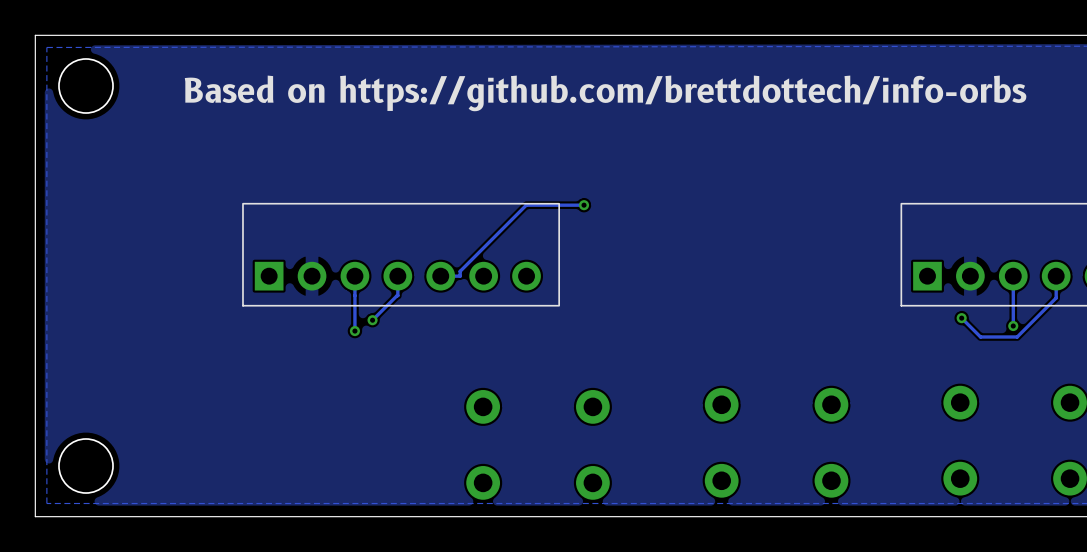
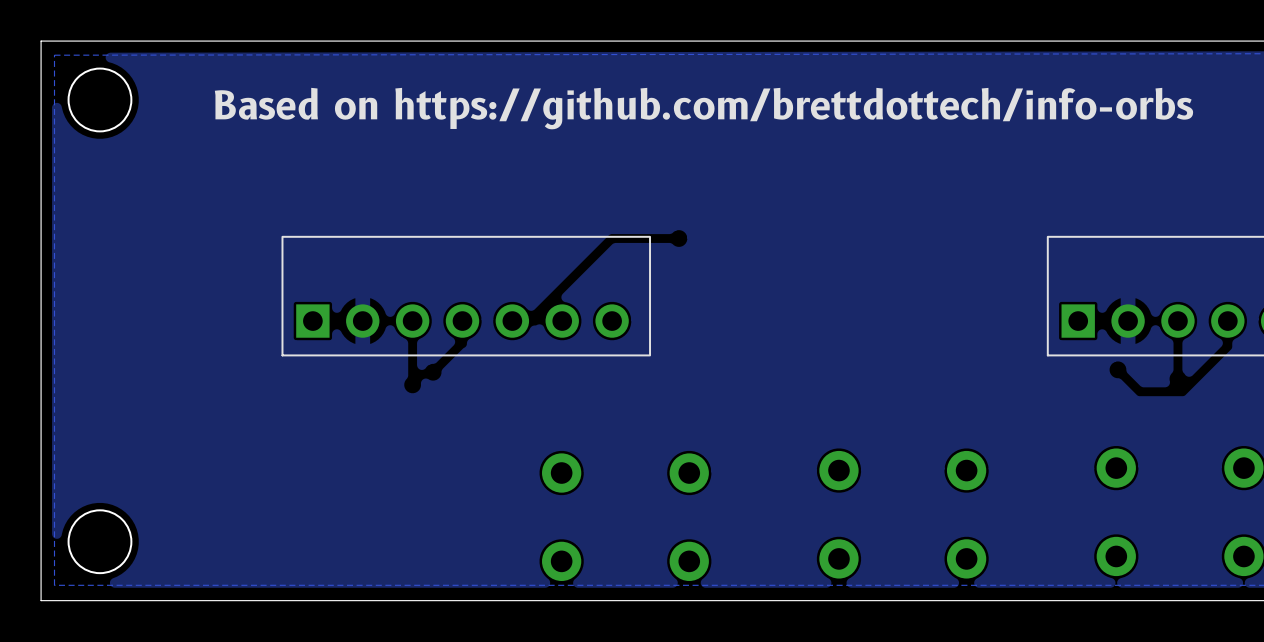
track: (584, 205) (526, 205) (460, 271) (460, 276) (440, 276) -> none
via: (584, 205) -> none
track: (354, 276) (354, 331) -> none
track: (397, 276) (397, 295) (372, 320) -> none
track: (1013, 276) (1013, 325) -> none
track: (1056, 276) (1056, 298) (1017, 336) (980, 336) (961, 318) -> none
via: (961, 318) -> none
via: (372, 320) -> none
via: (1013, 326) -> none
via: (354, 331) -> none

